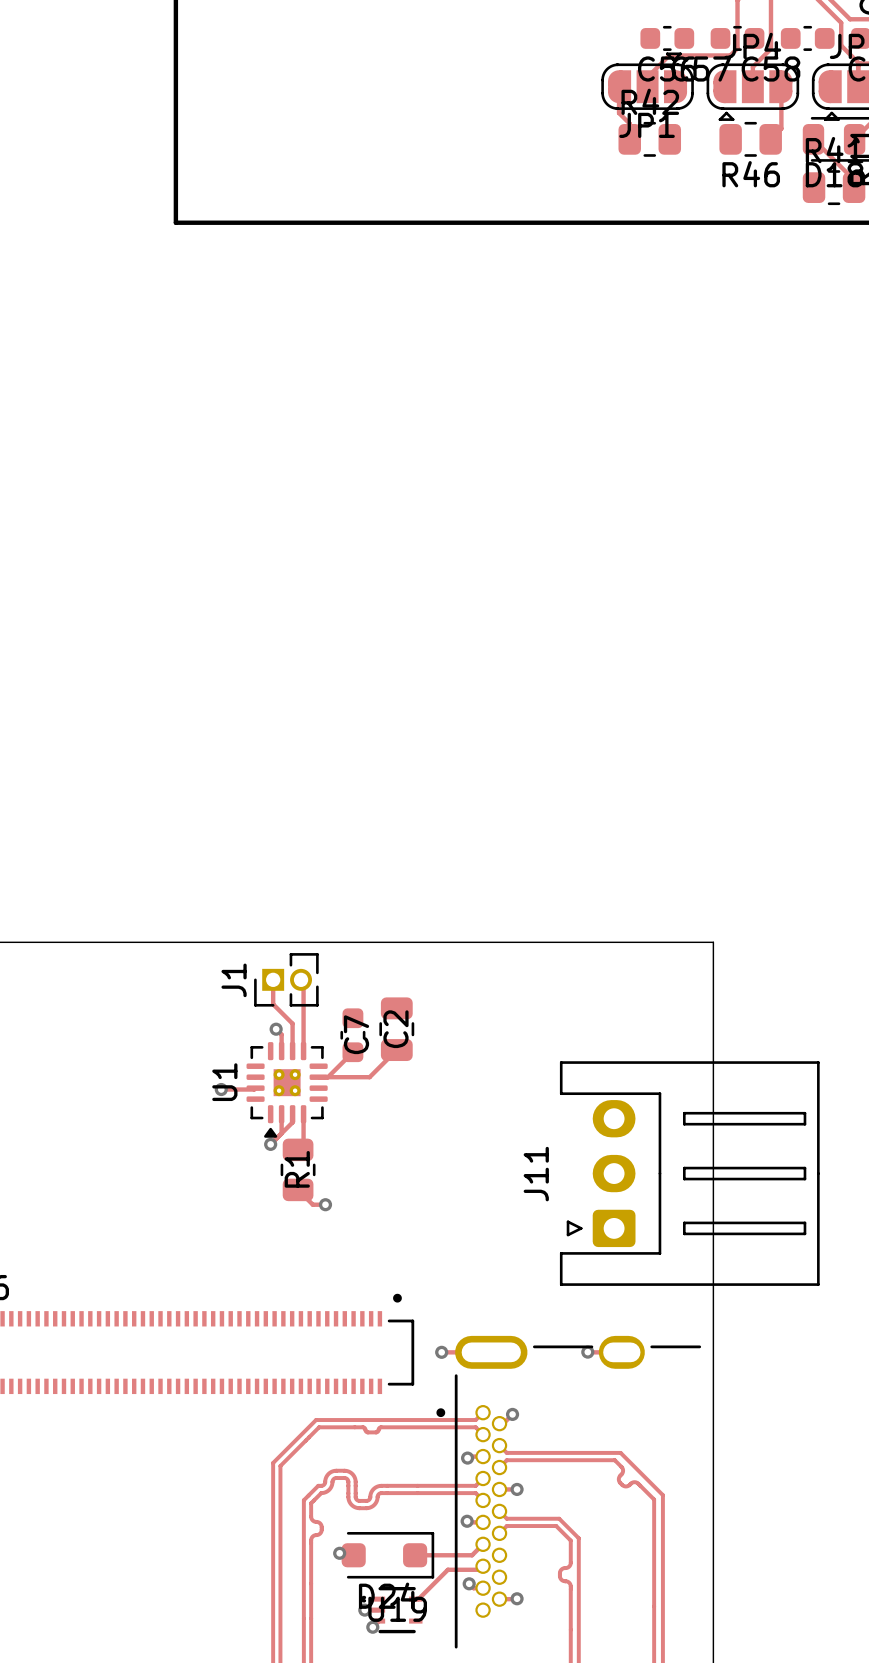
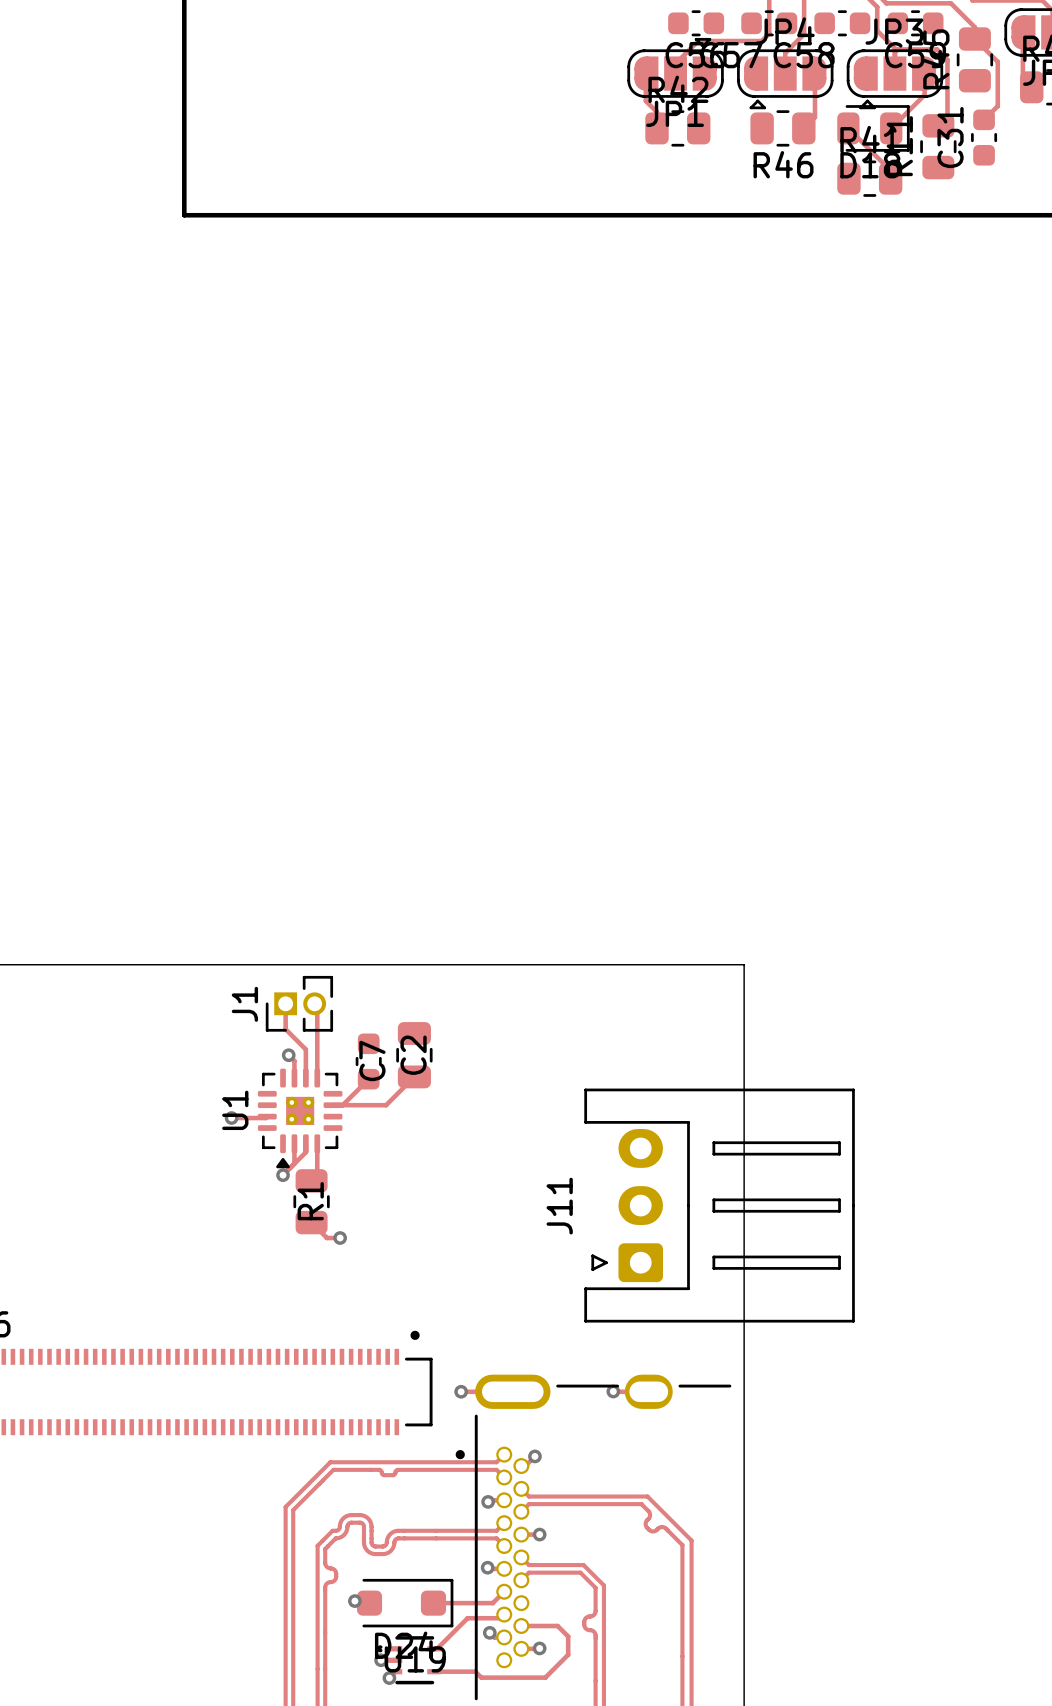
track: none -> (521, 1625) (557, 1625) (568, 1636) (568, 1654) (545, 1677) (481, 1677) (475, 1671) (434, 1671)

